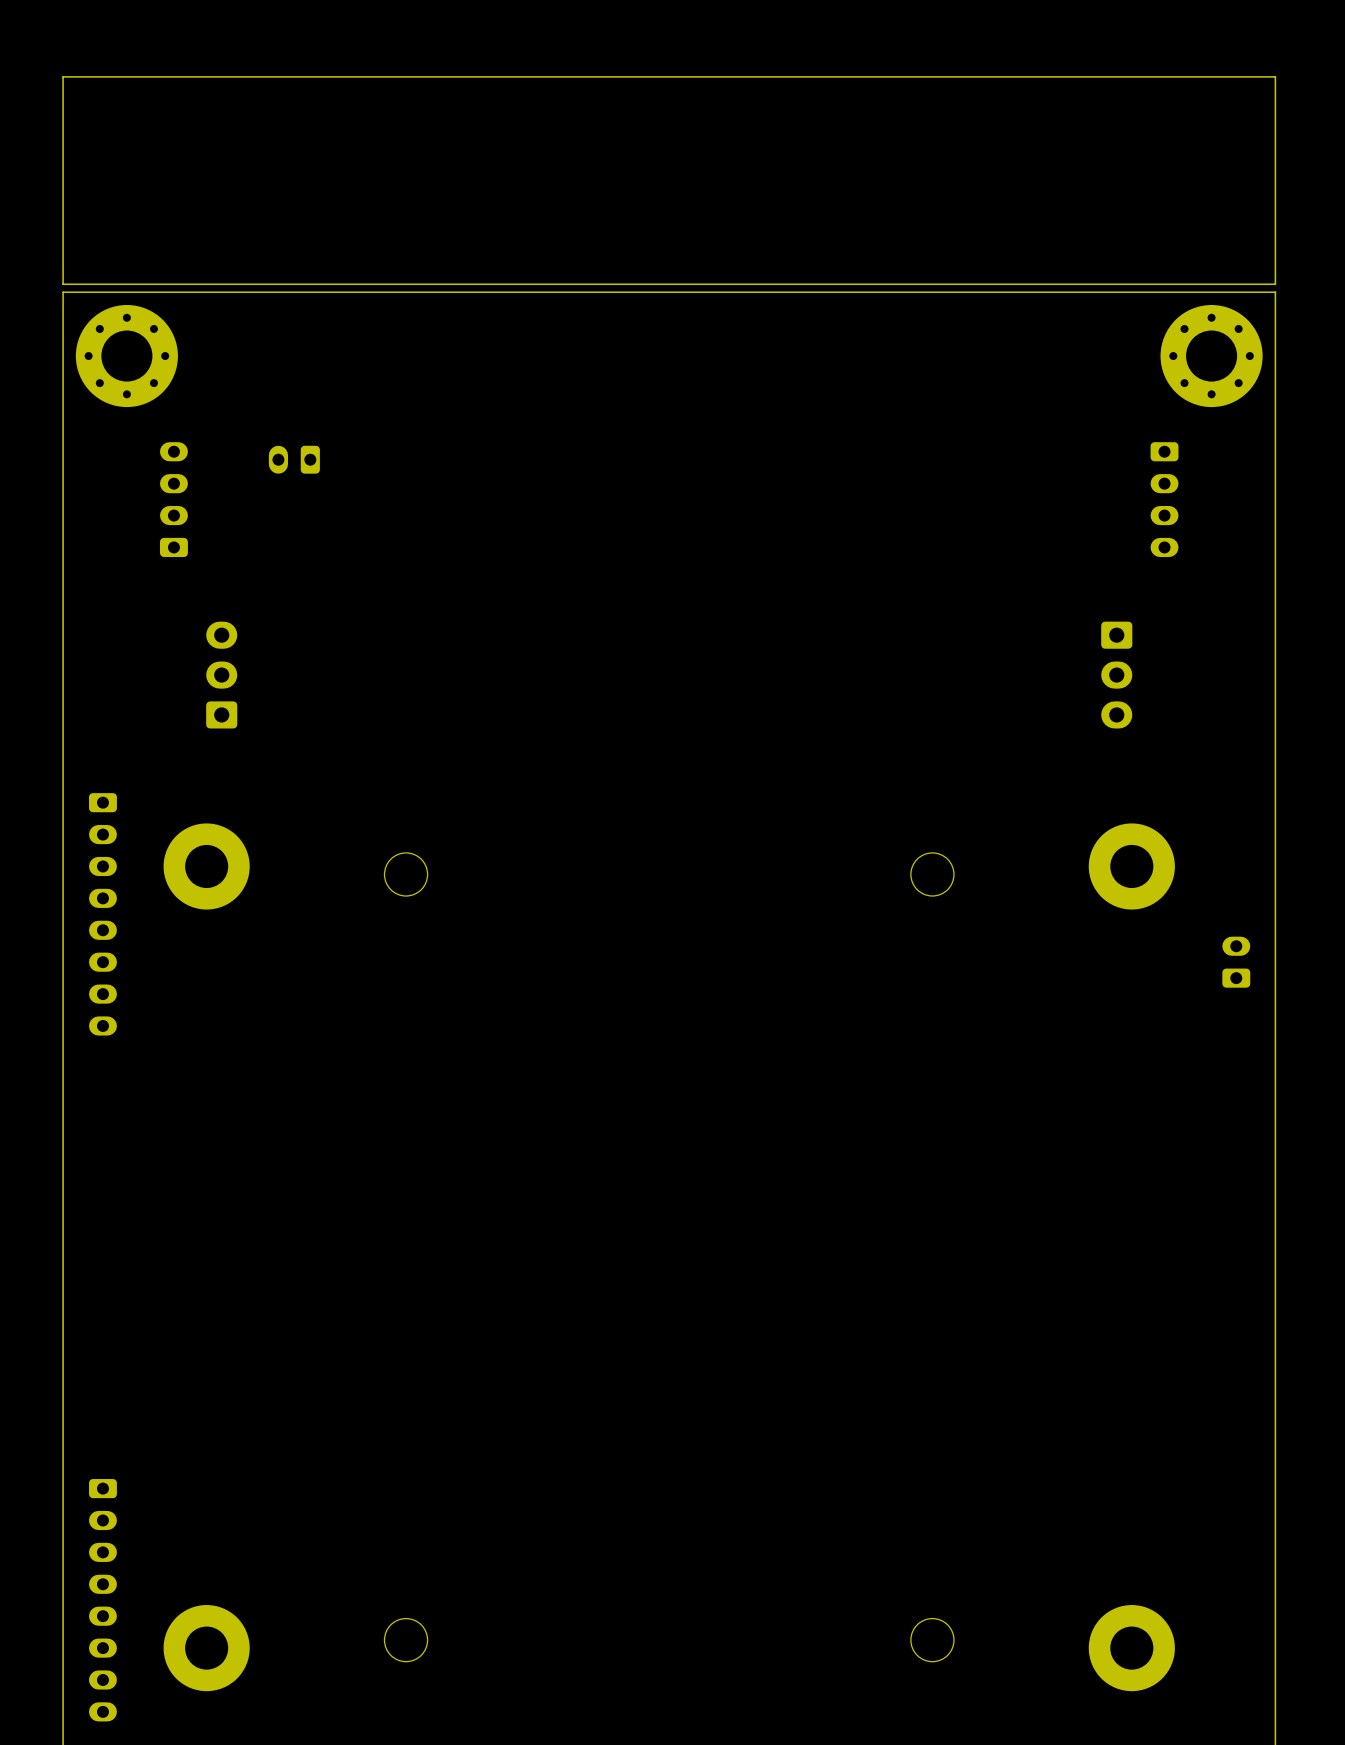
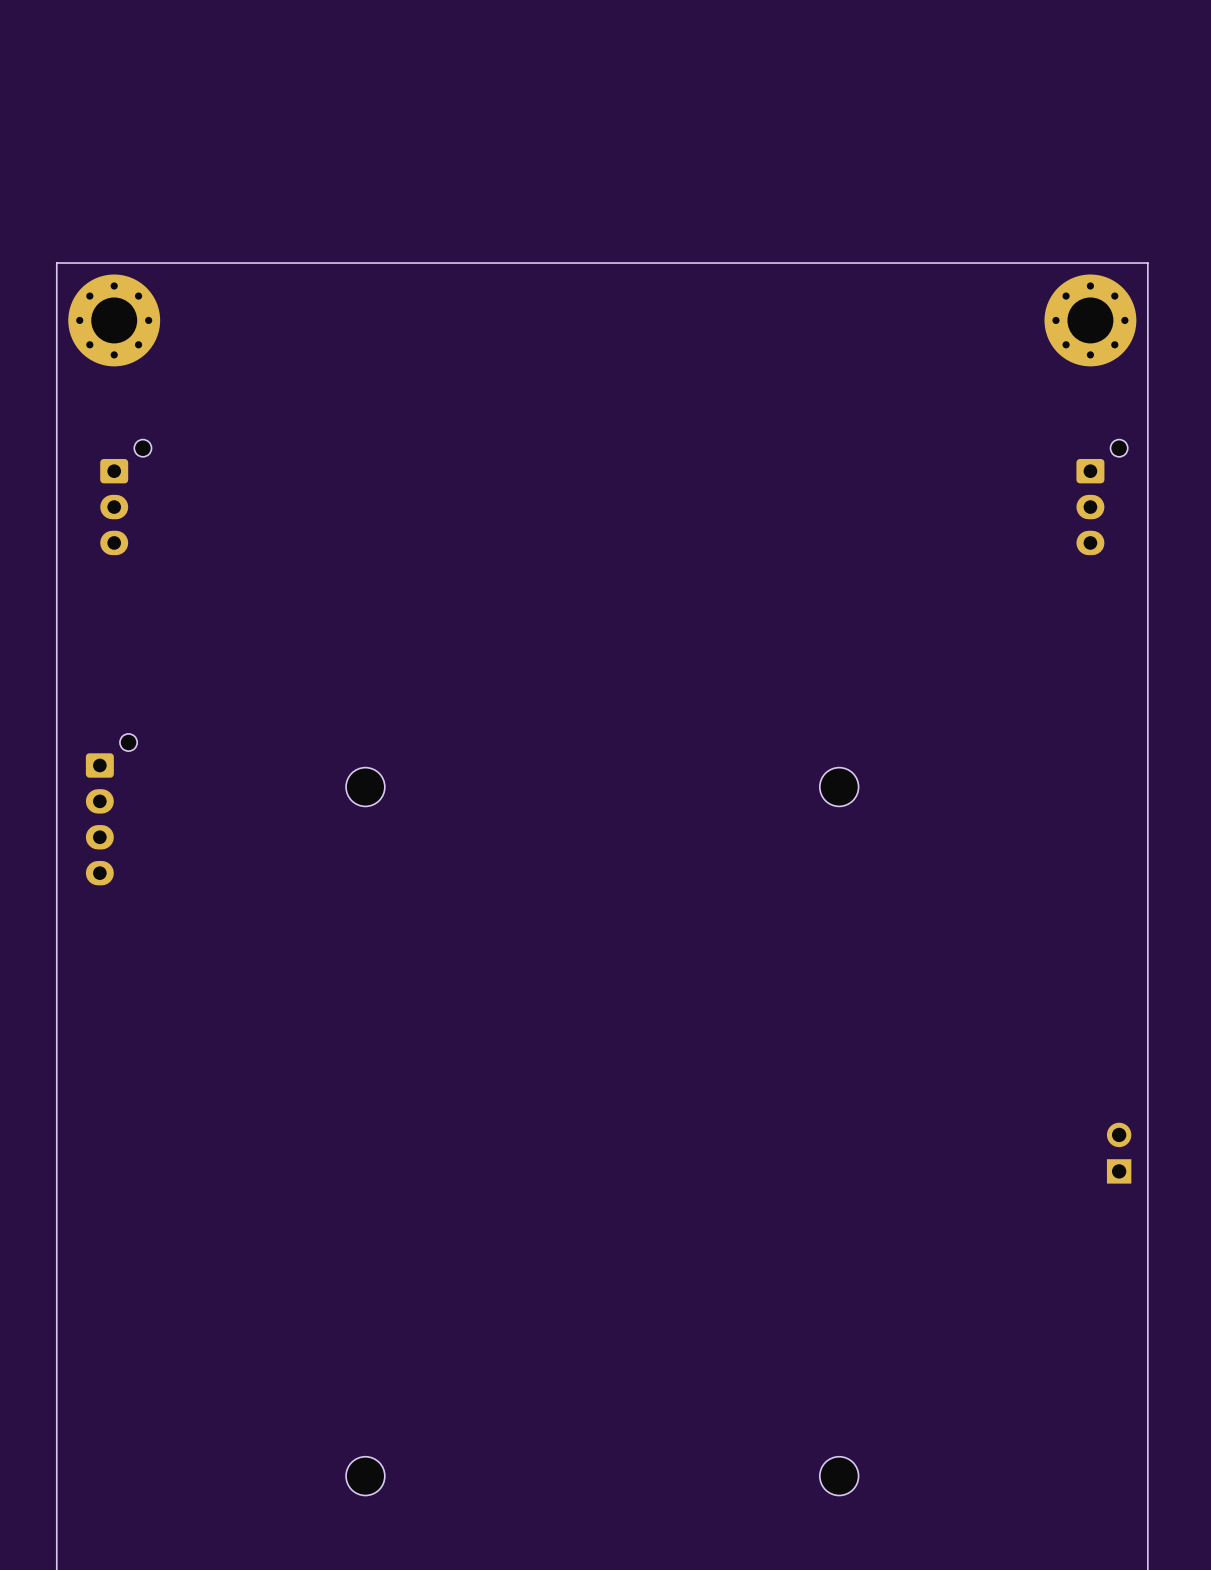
board edge: (1275, 76) (63, 76) (63, 284) (1275, 284) (1275, 76) -> none
part: (294, 459) -> none
part: (173, 499) -> none
part: (1164, 499) -> none
part: none -> (125, 497)
part: none -> (1102, 497)
part: (221, 675) -> none
part: (1116, 675) -> none
part: (206, 866) -> none
part: (1131, 866) -> none
part: none -> (111, 809)
part: (102, 914) -> none
part: (1236, 962) -> none
part: none -> (1119, 1153)
part: (102, 1600) -> none
part: (206, 1648) -> none
part: (1131, 1648) -> none

